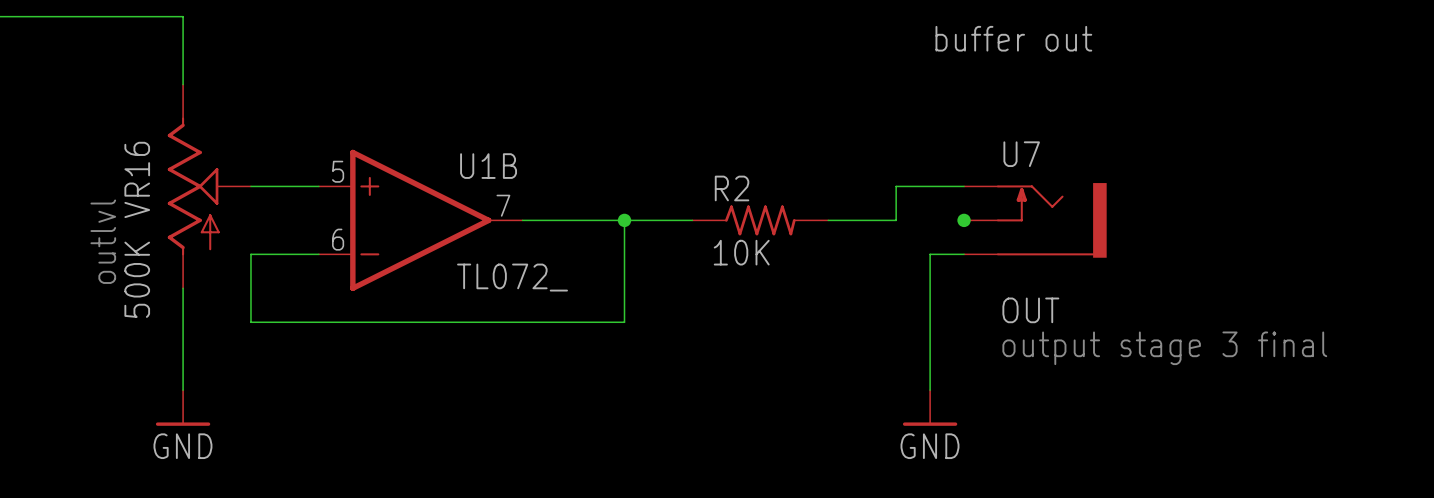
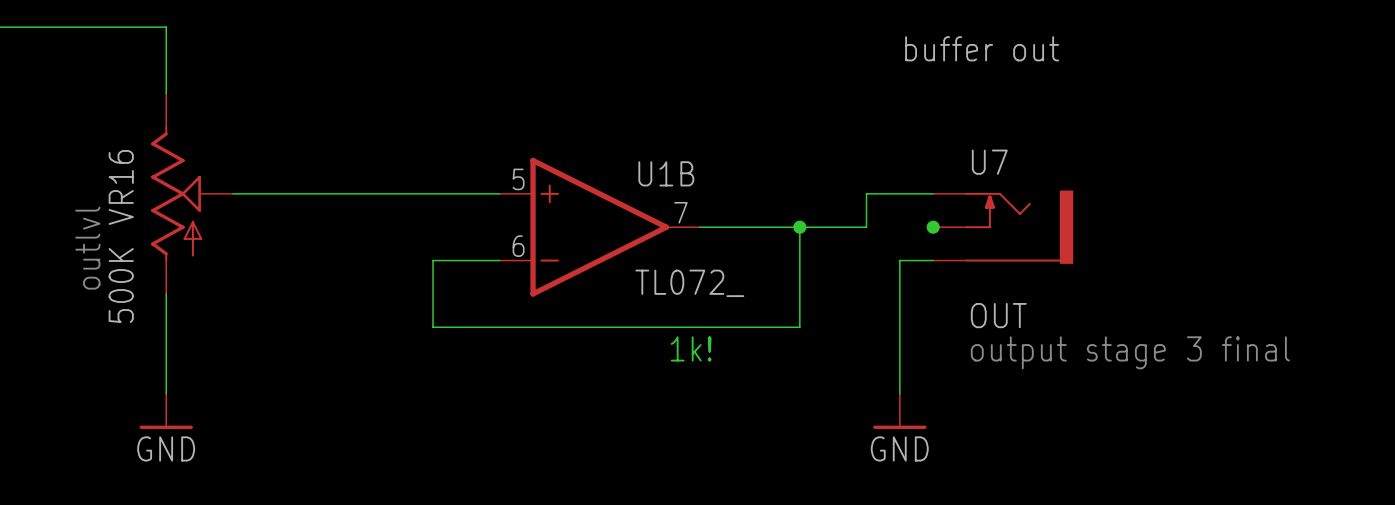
wire: none -> (299, 193) (499, 193)
U1B position: (420, 220) -> (599, 227)
wire: (522, 220) (692, 220) -> none
wire: (624, 220) (624, 322) -> (699, 227) (799, 227) (799, 327) (599, 327)
junction: (624, 220) -> none
R2: 10K (760, 220) -> none
junction: none -> (799, 227)
wire: (318, 254) (250, 254) (250, 322) (454, 322) -> (499, 260) (433, 260) (433, 327)
text: none -> 1k! (691, 348)

